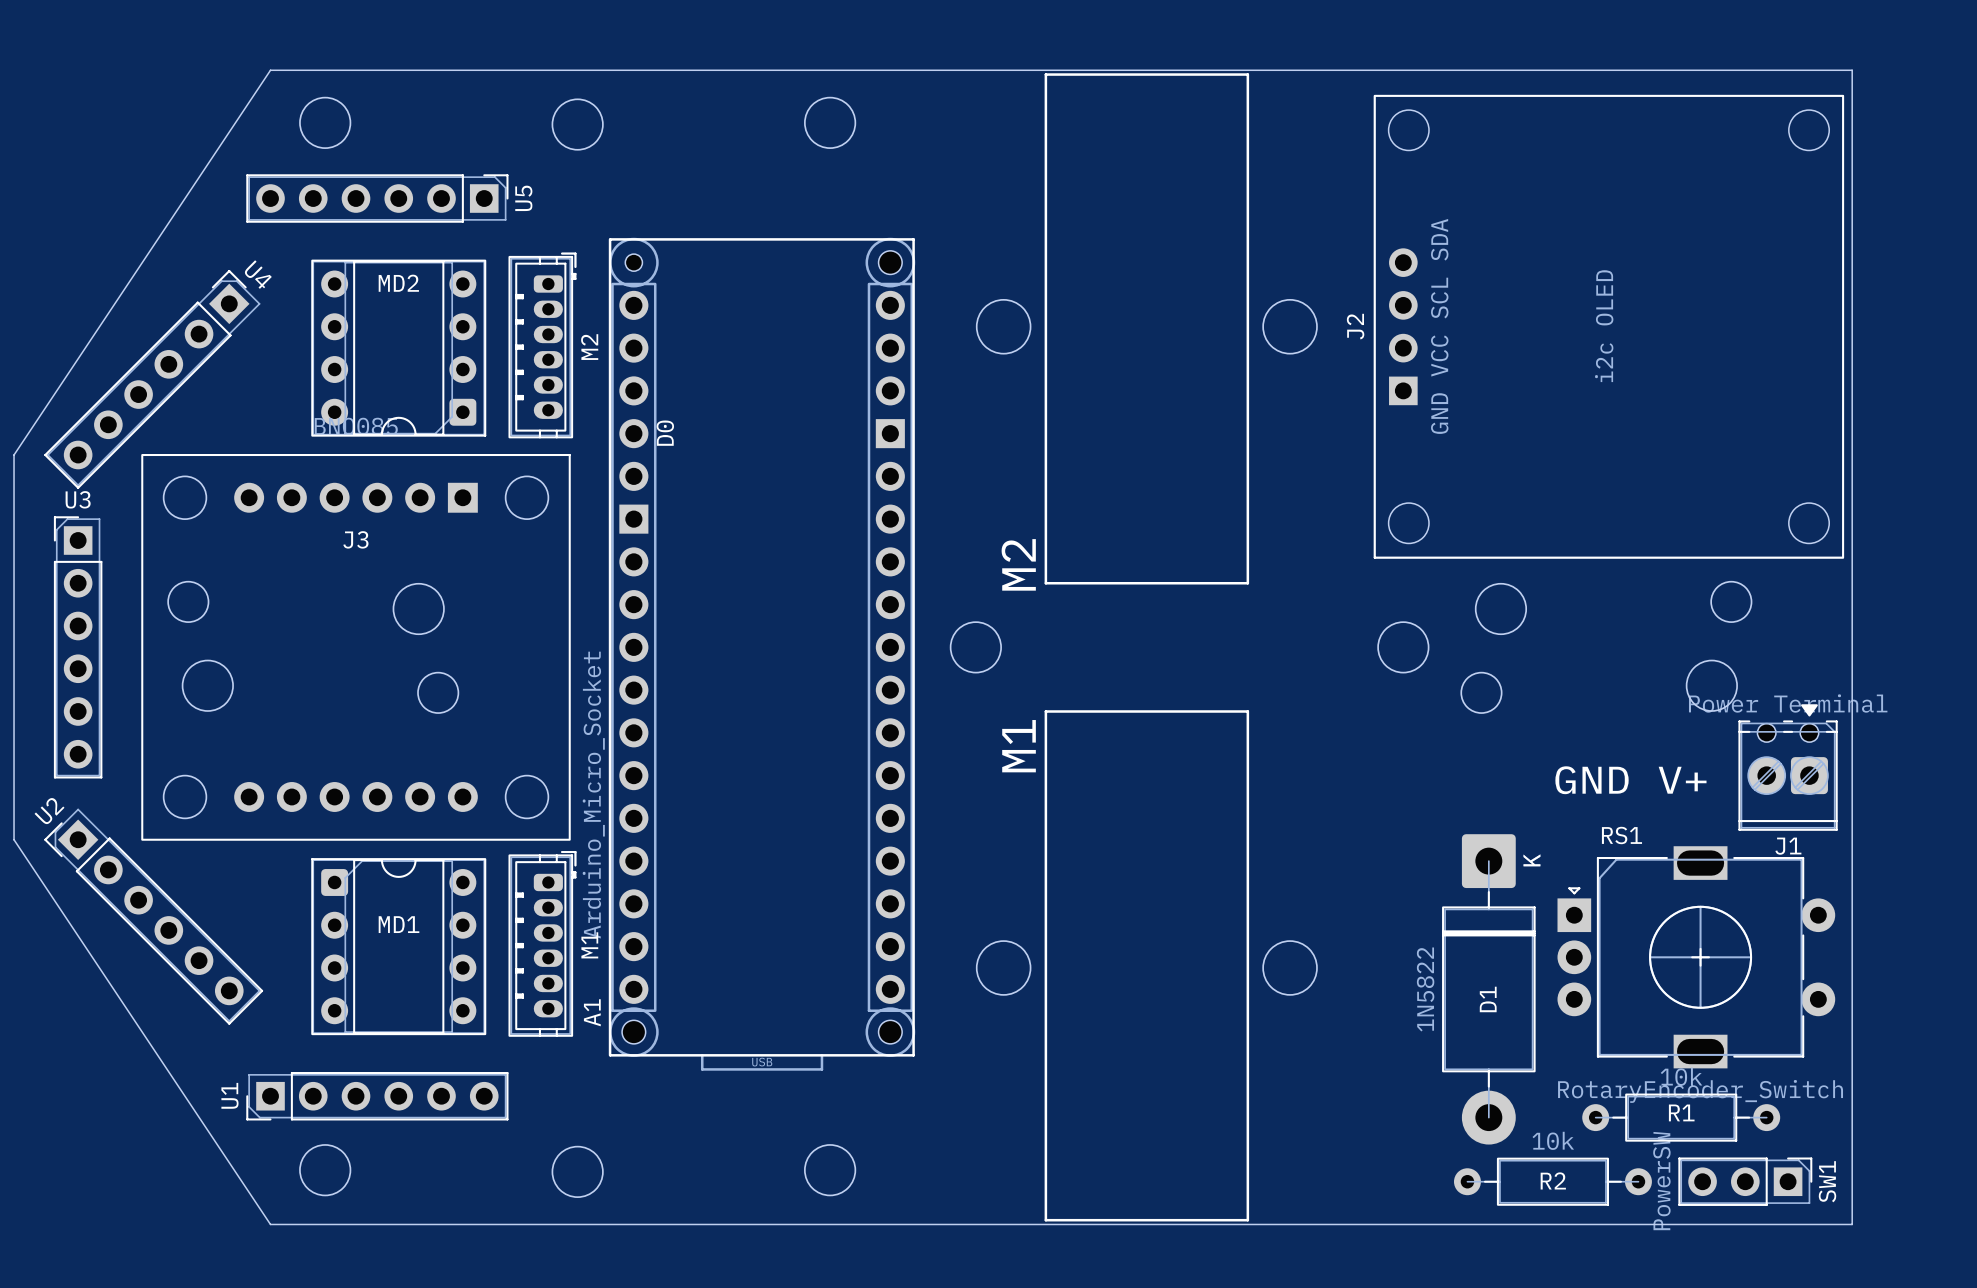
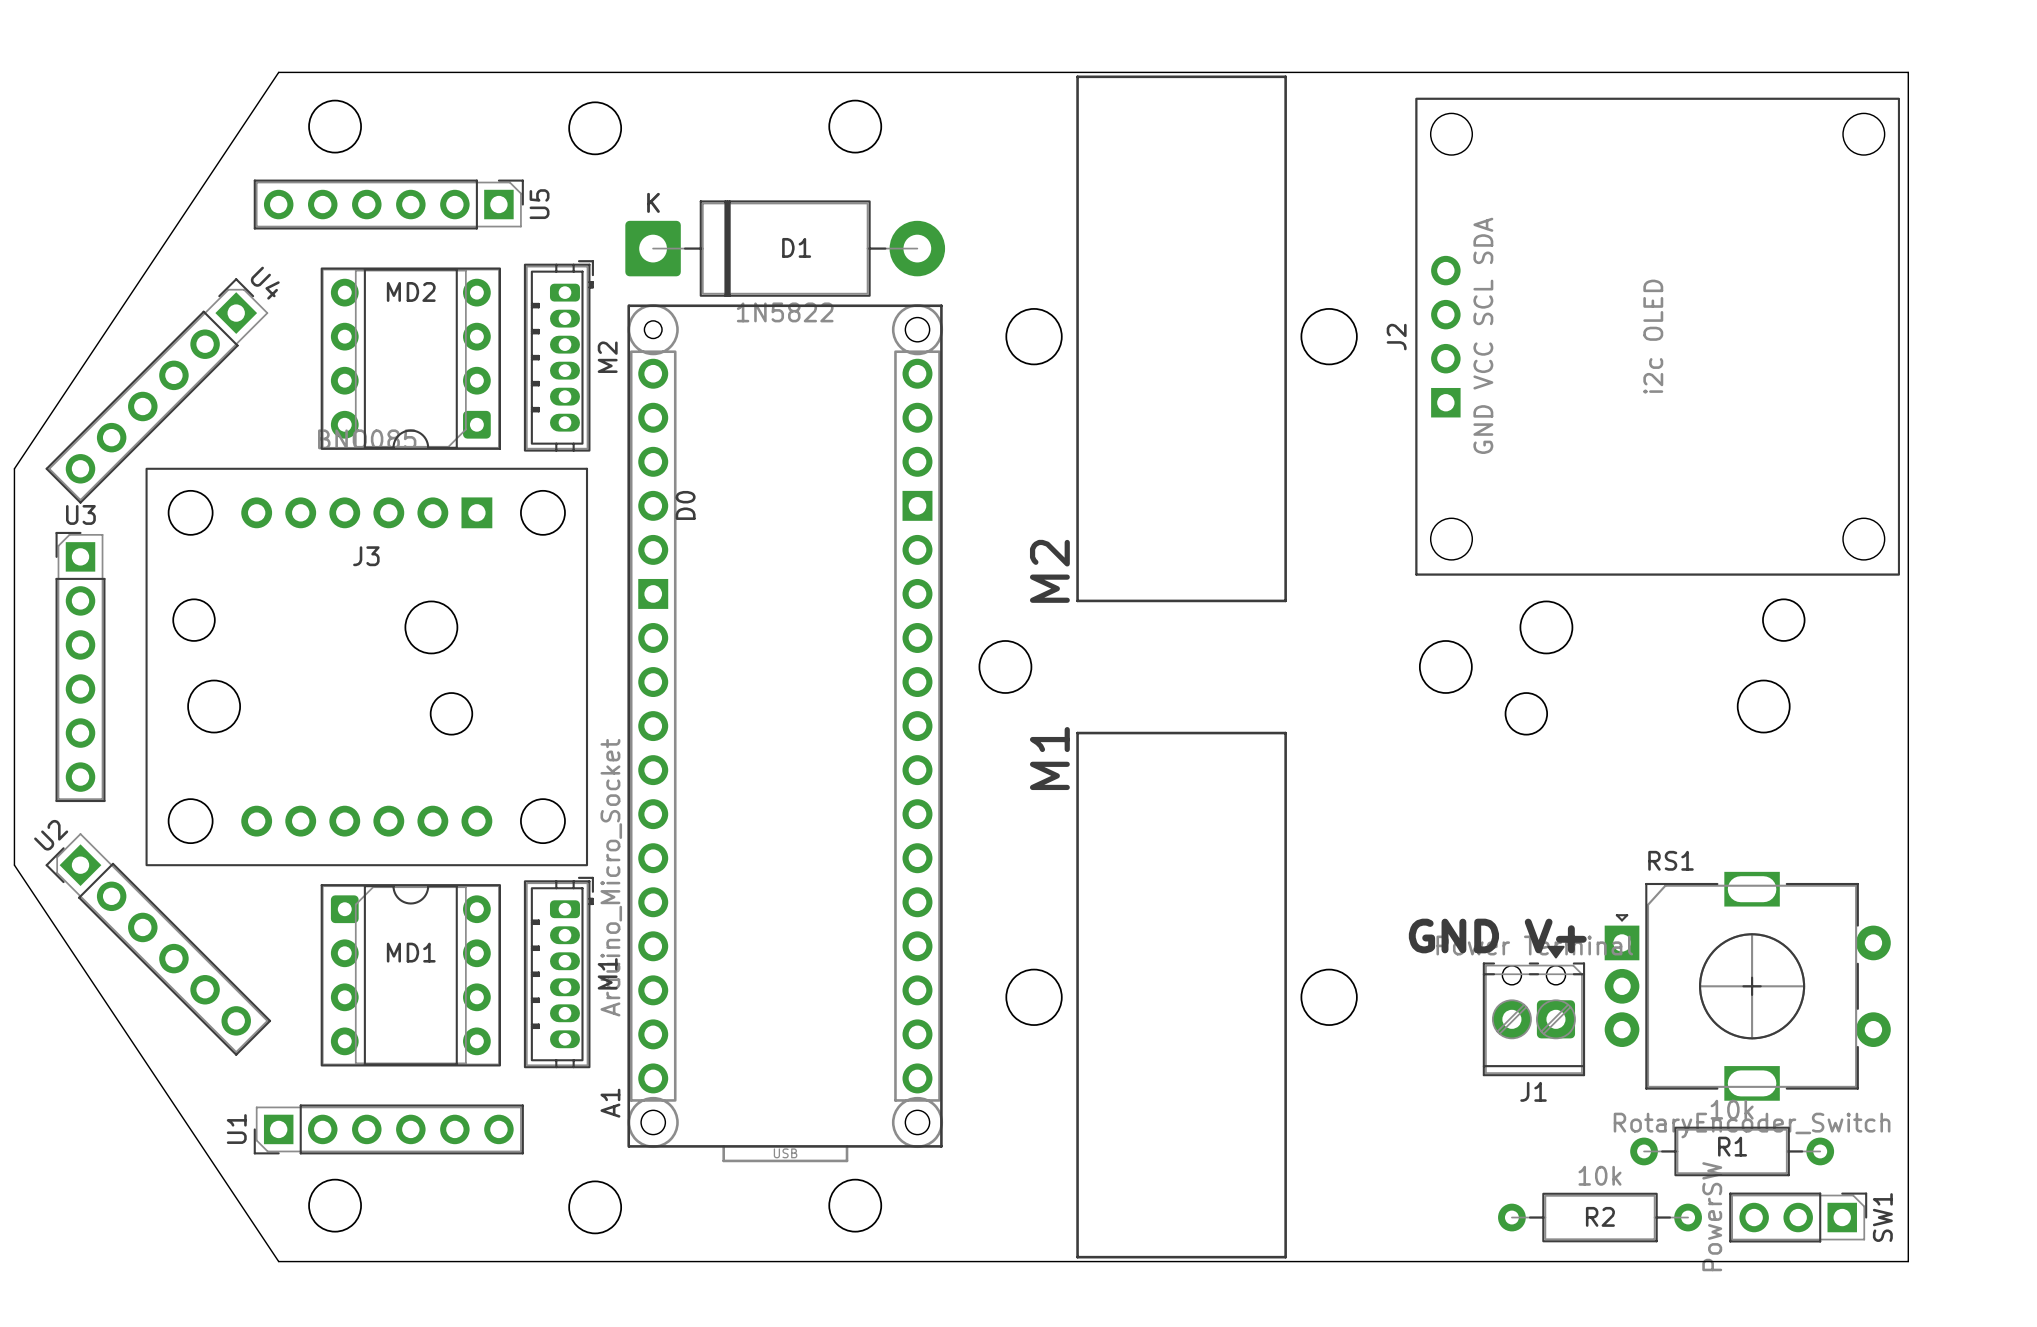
A1 position: (761, 654) -> (785, 733)
J1 position: (1788, 767) -> (1533, 1011)
text position: GND V+ (1630, 780) -> GND V+ (1497, 936)
D1 rotation: 0° (1488, 989) -> 90° counterclockwise (785, 248)
D1 position: (1488, 989) -> (785, 248)

